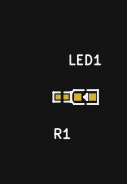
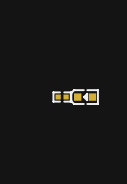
LED1 name: LED1 (85, 59) -> none
R1 name: R1 (62, 133) -> none

